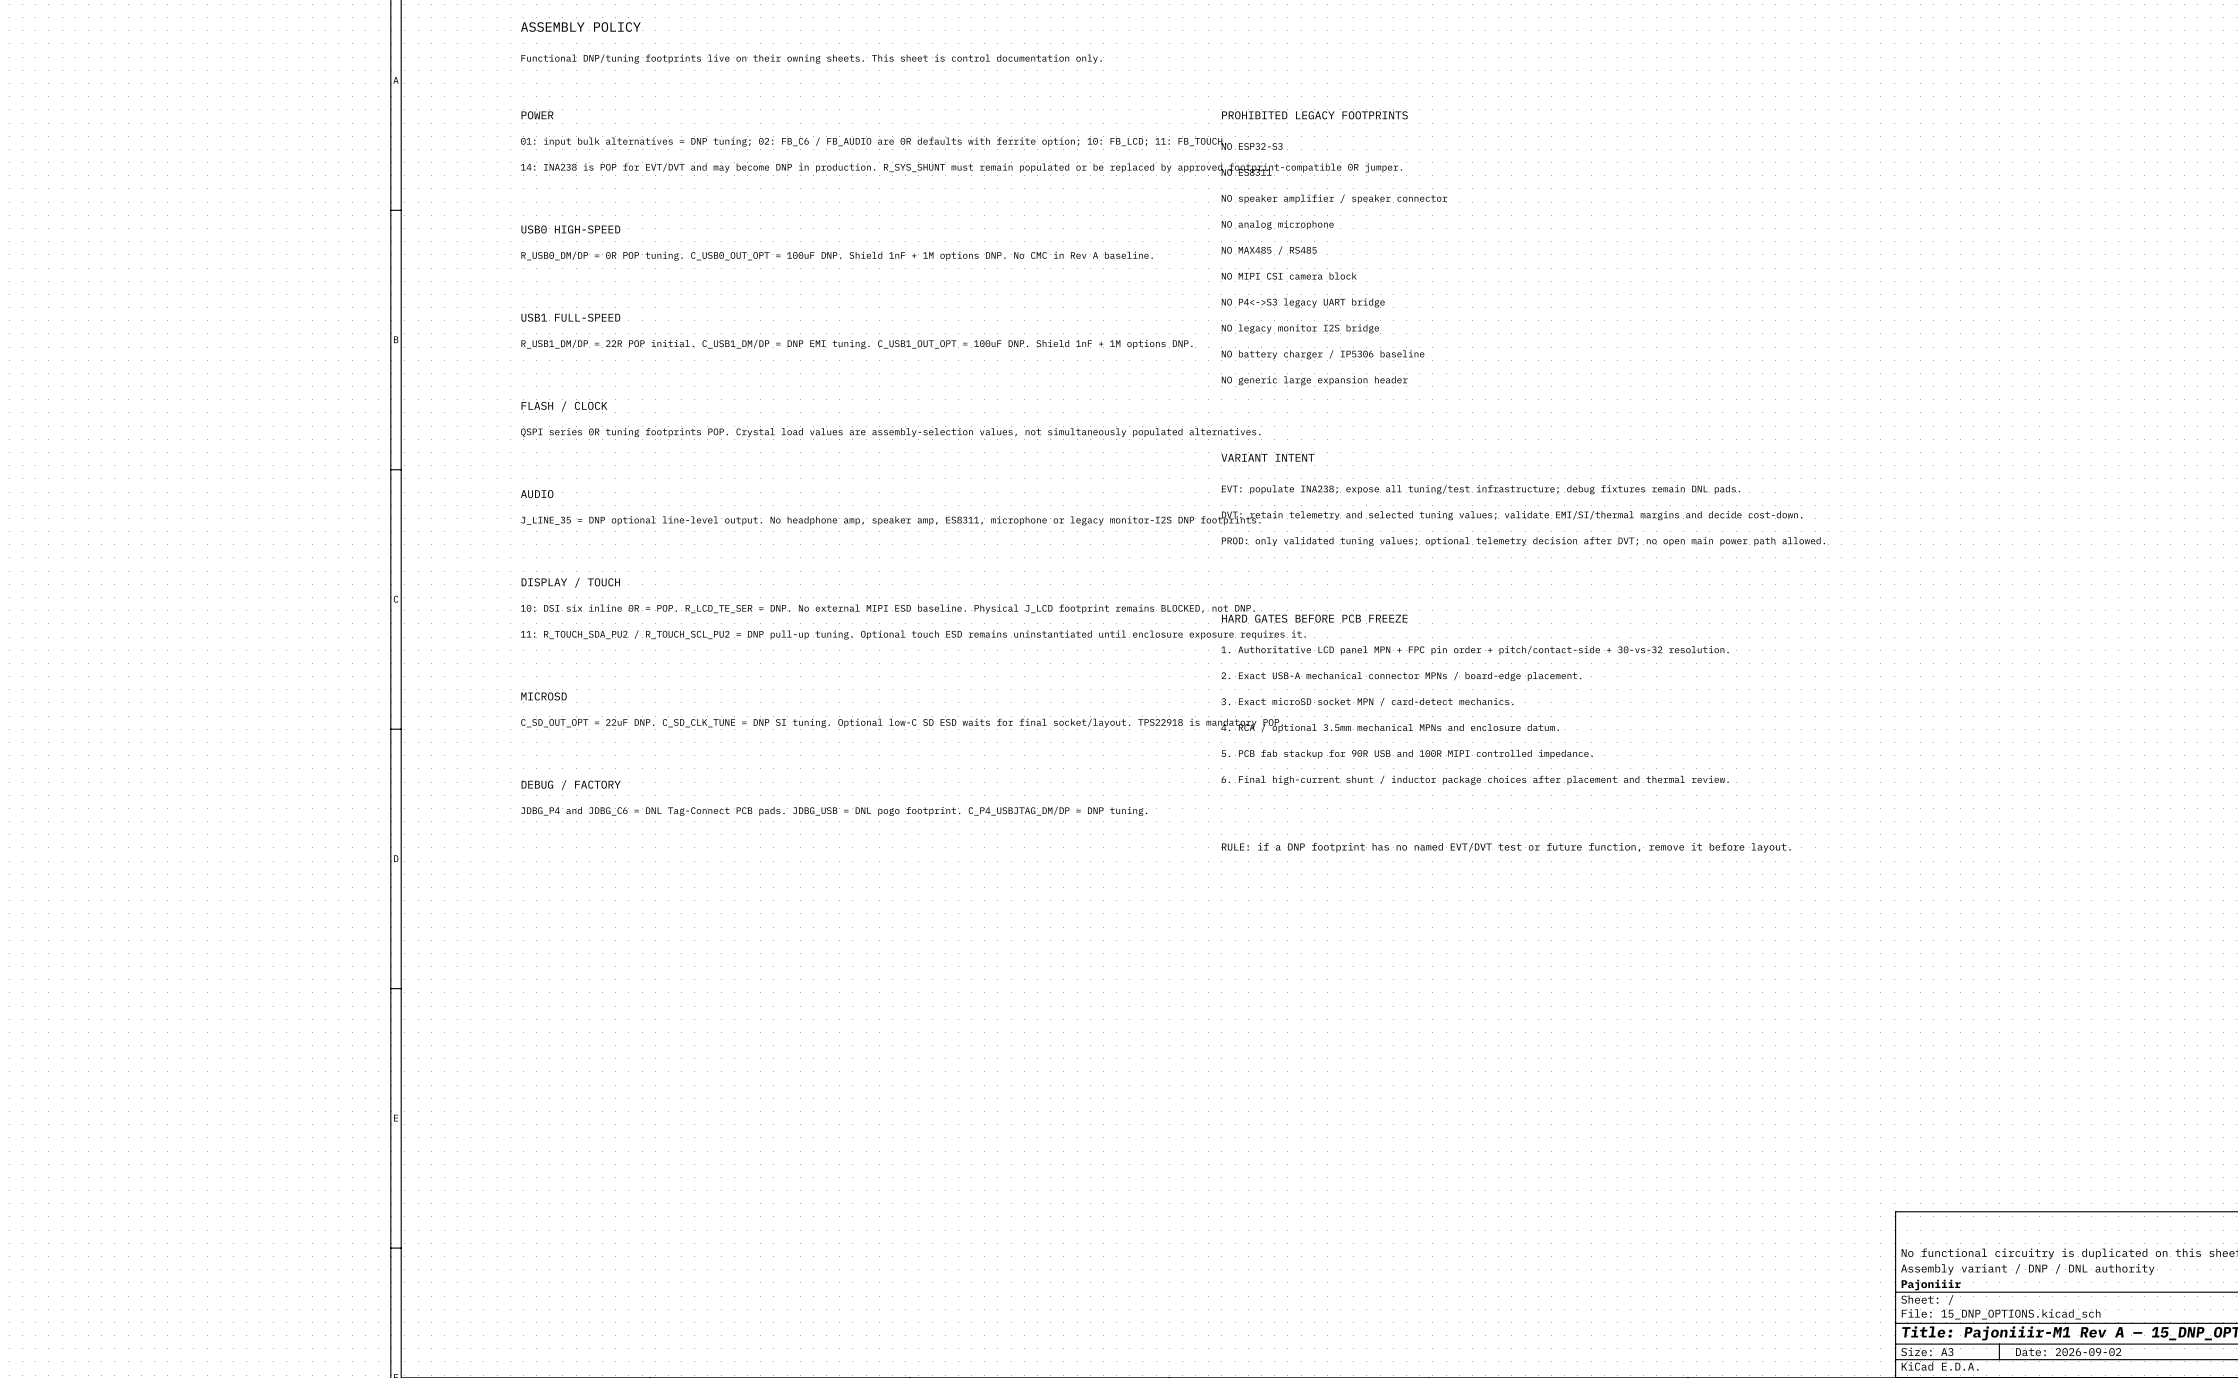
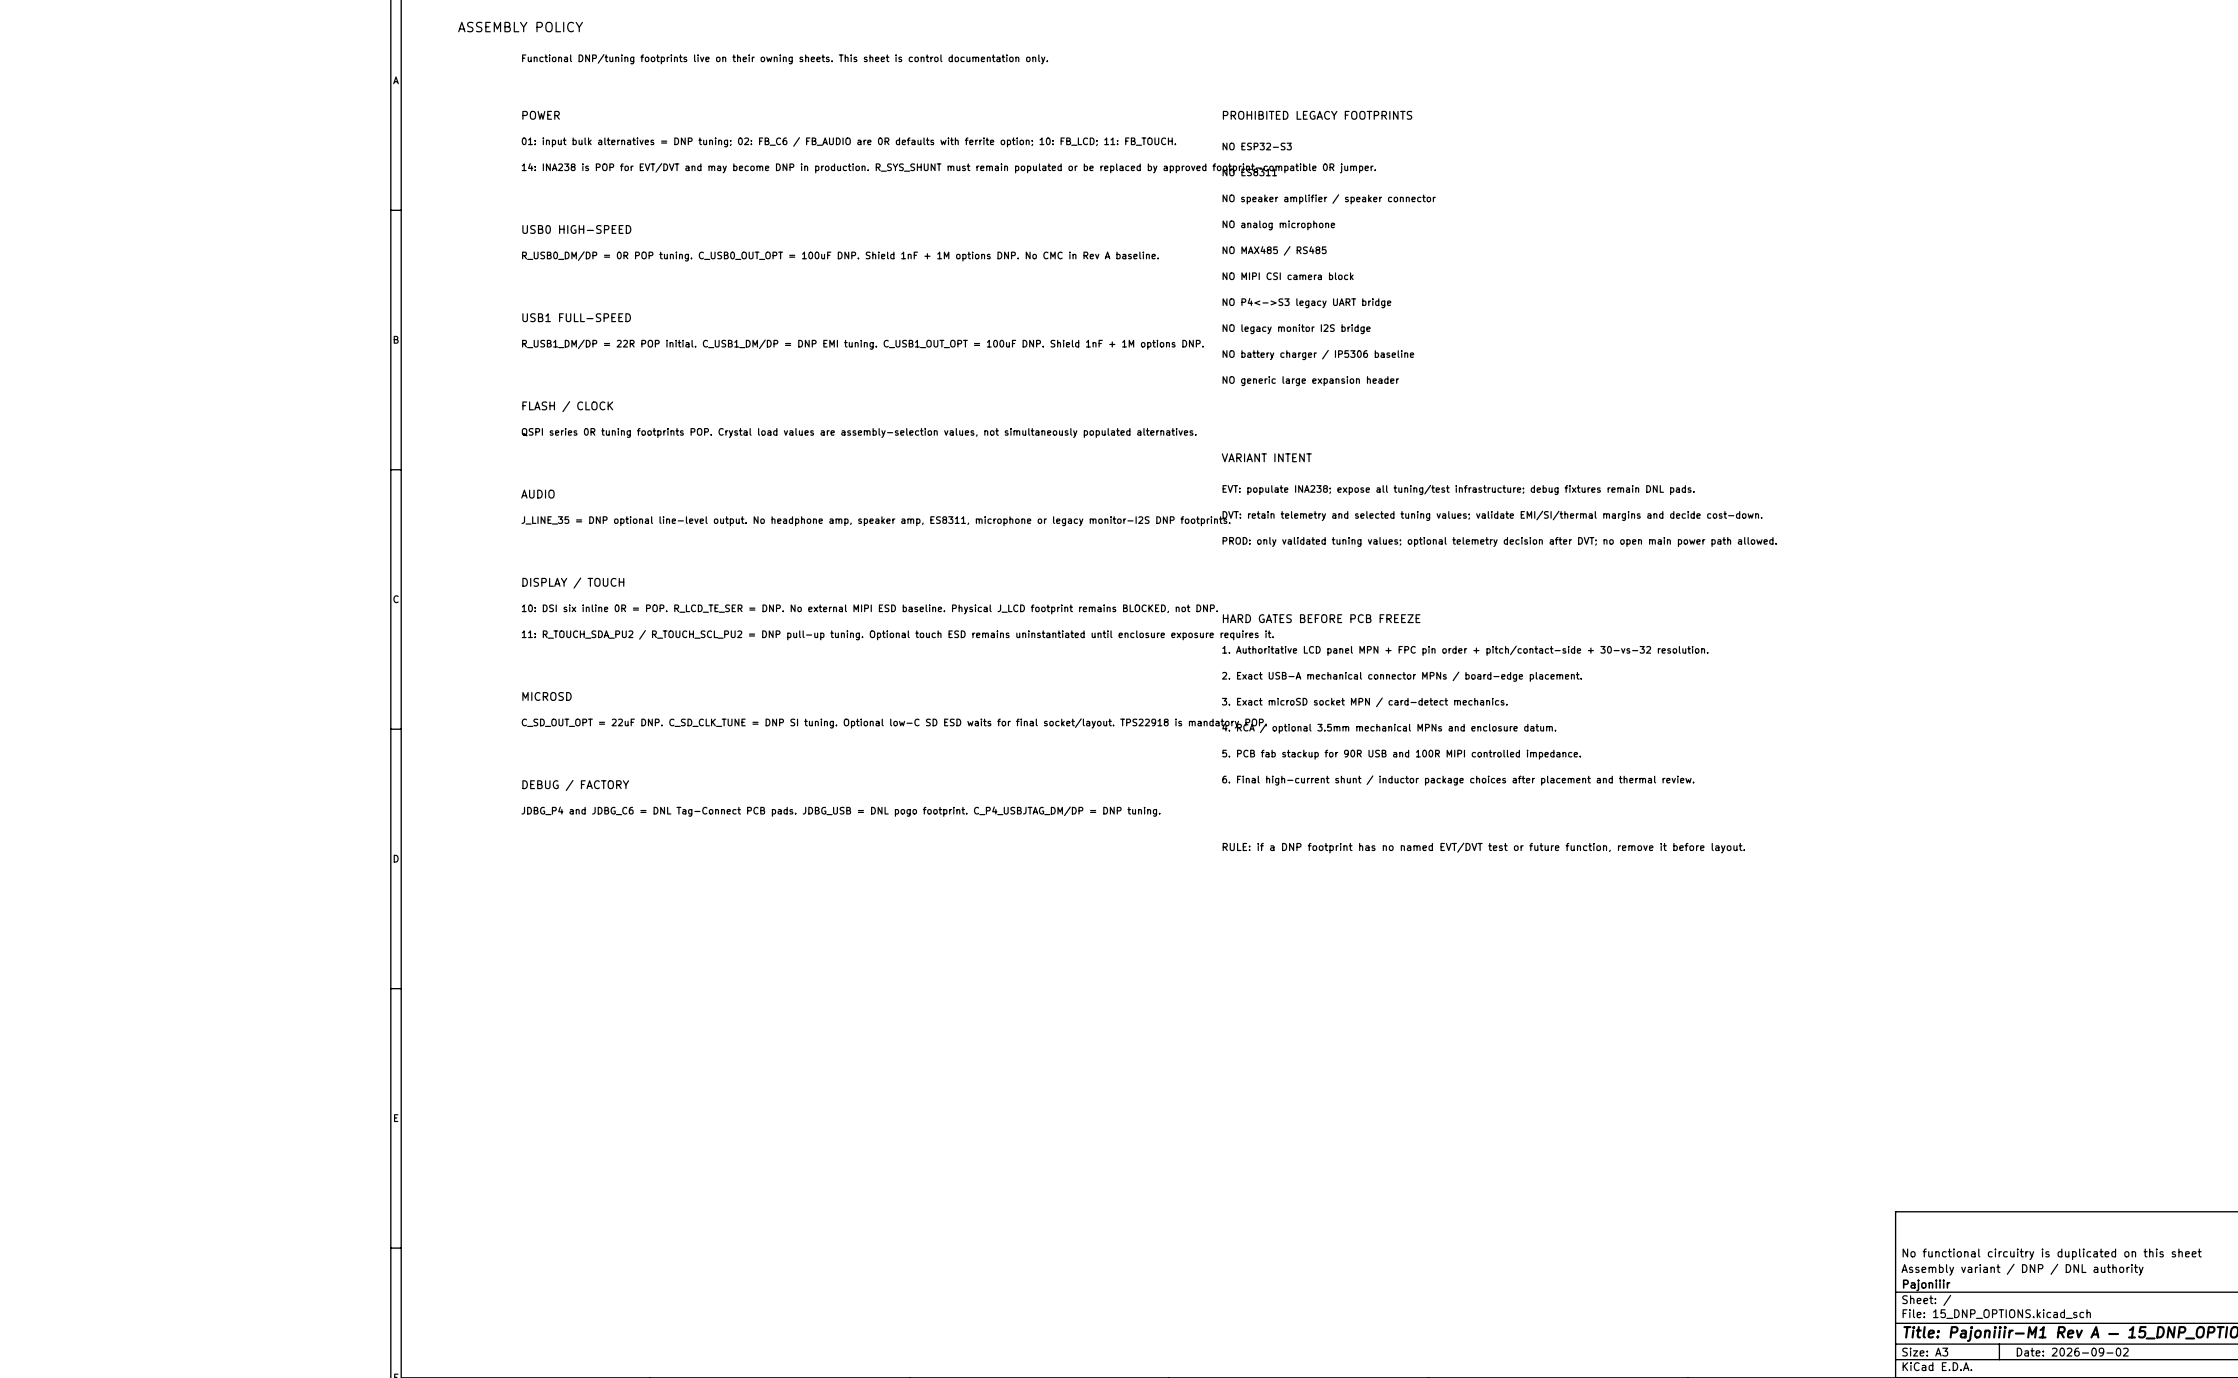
text position: ASSEMBLY POLICY (580, 27) -> ASSEMBLY POLICY (520, 27)

